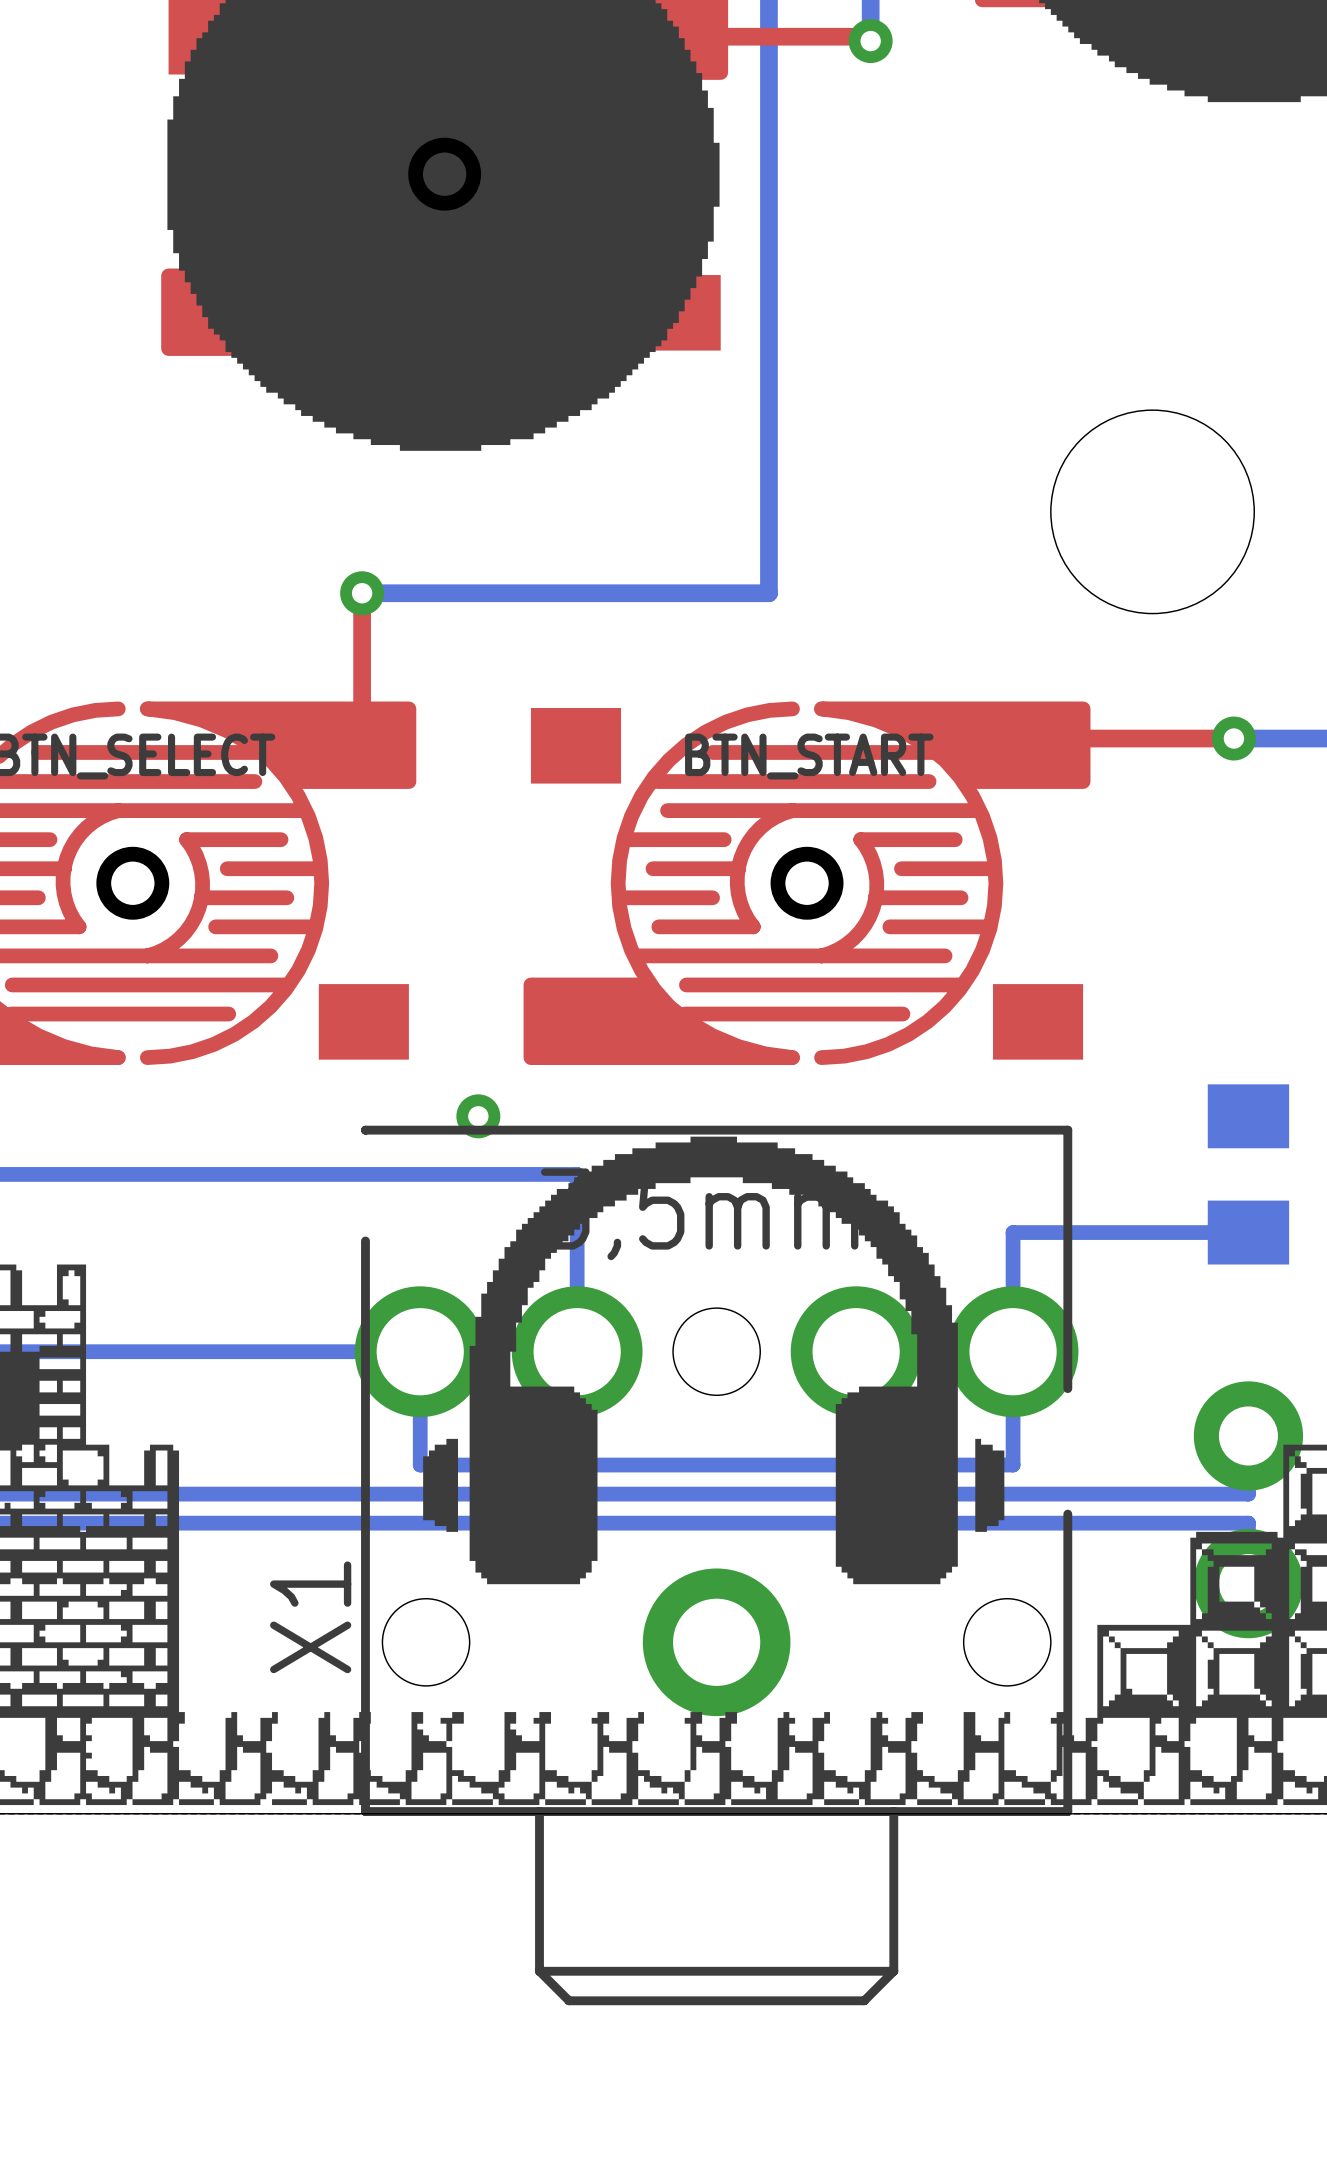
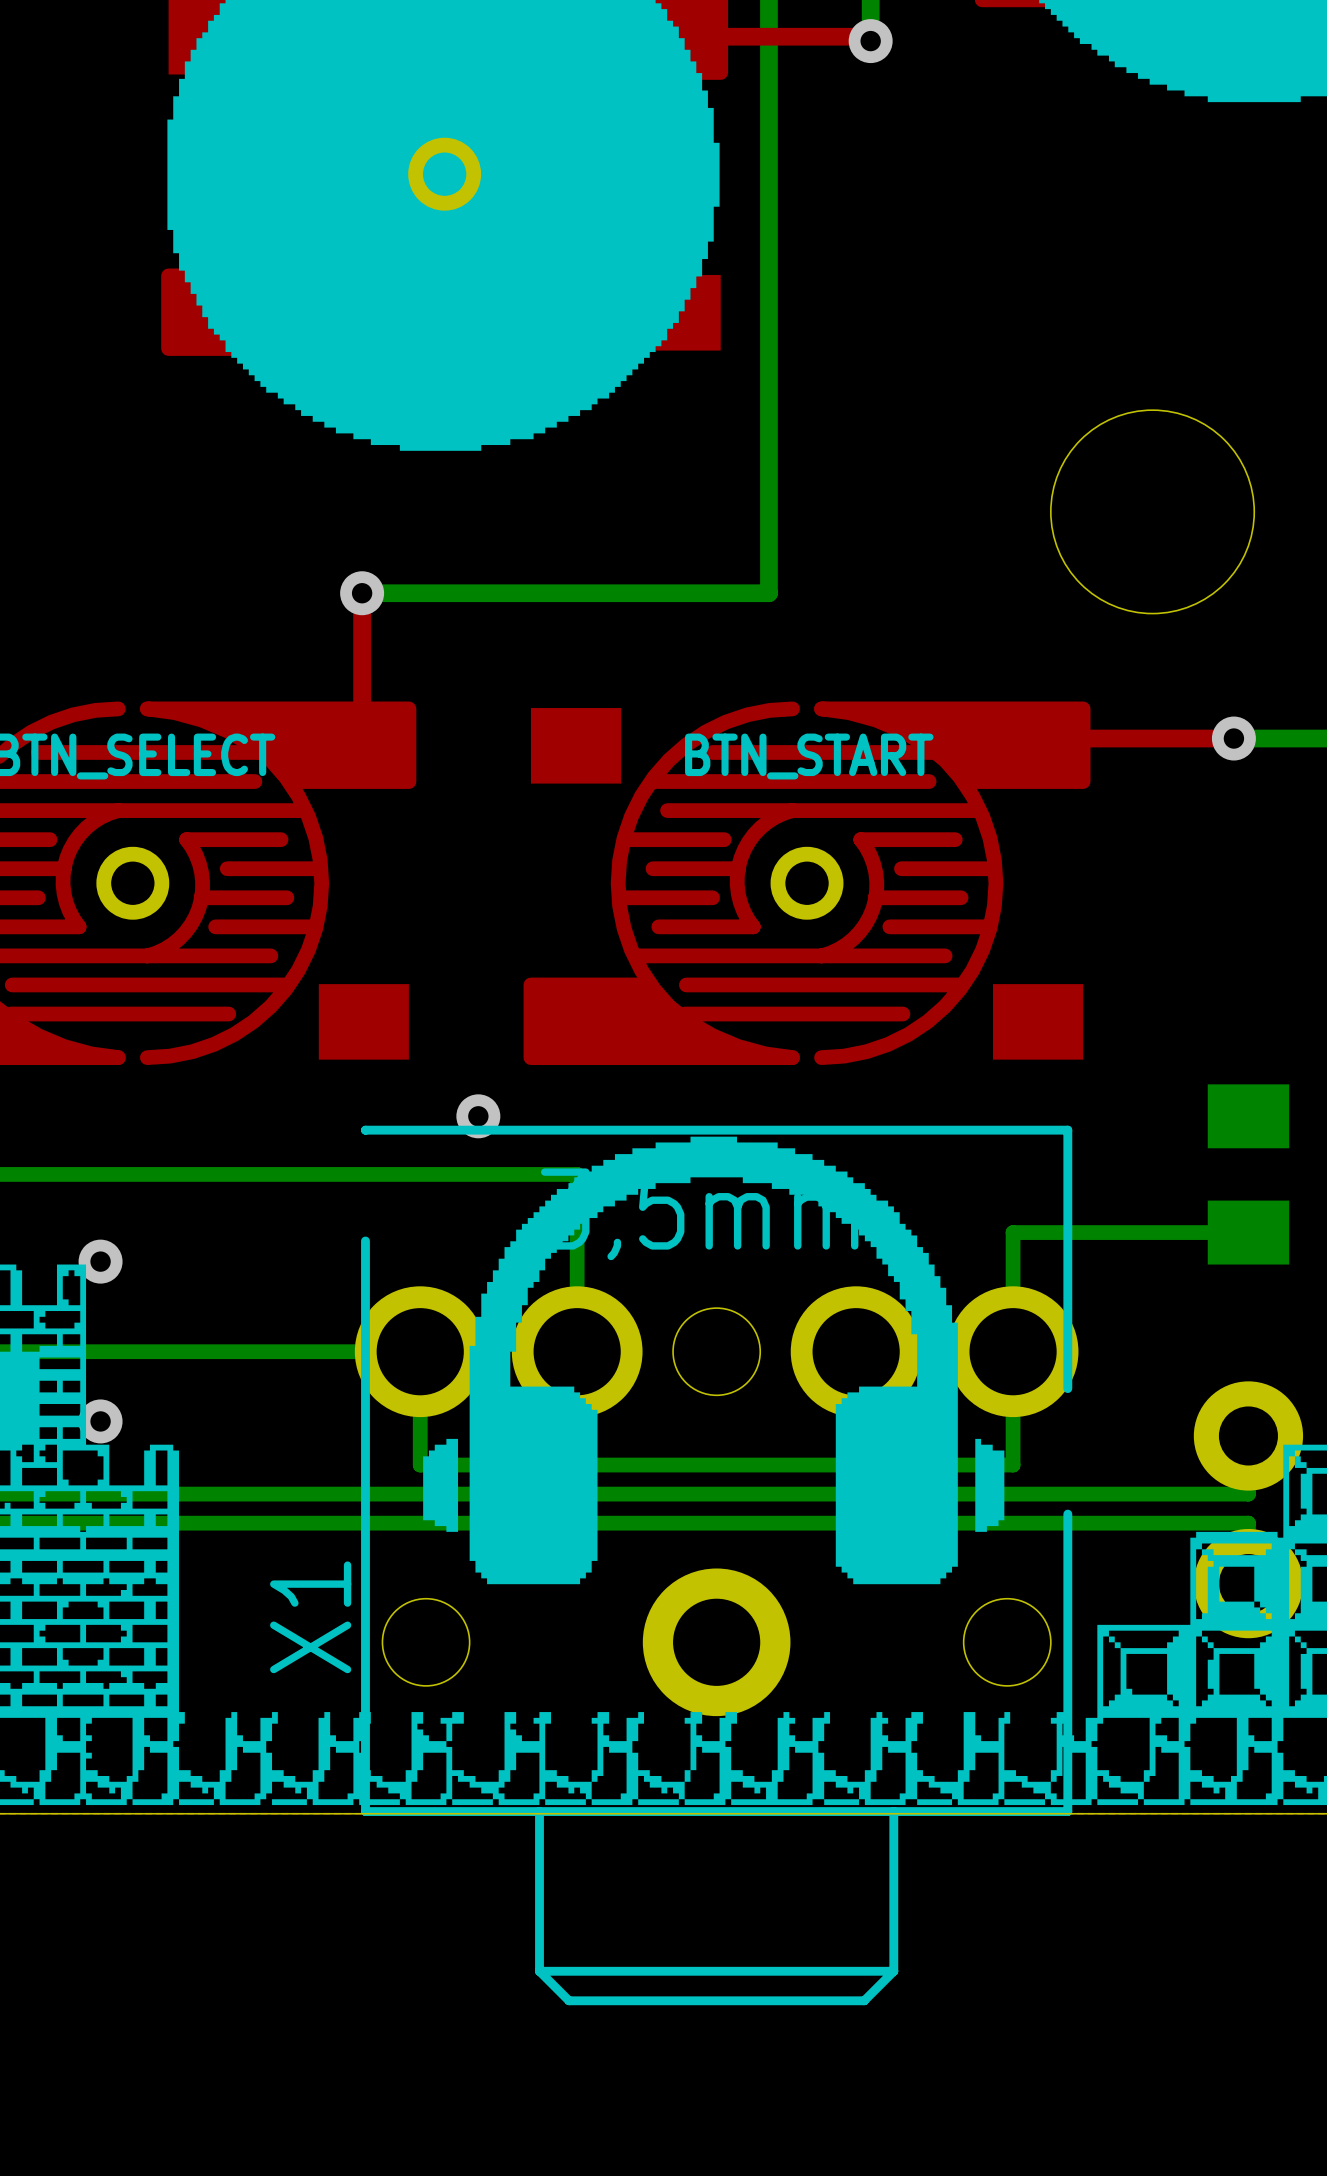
via: none -> (100, 1261)
via: none -> (100, 1421)

